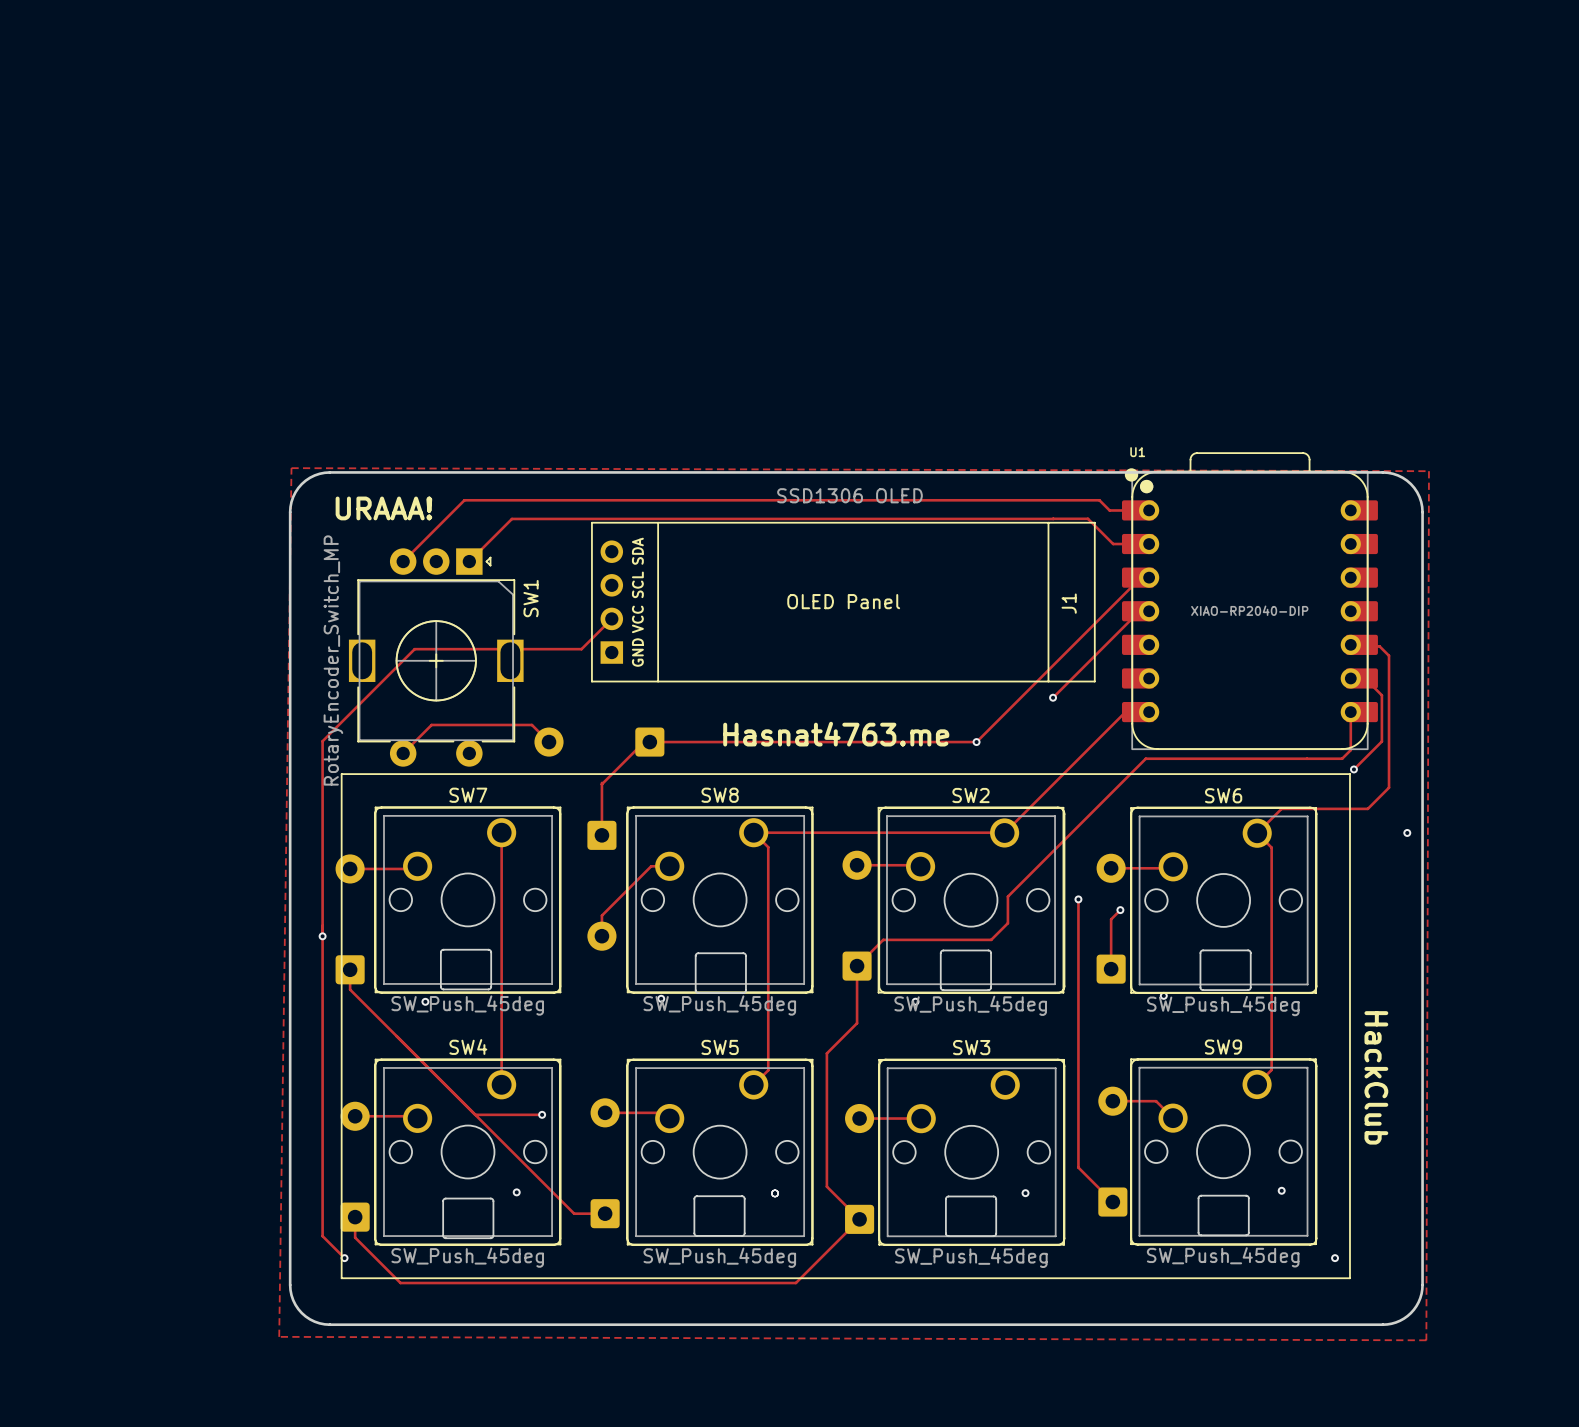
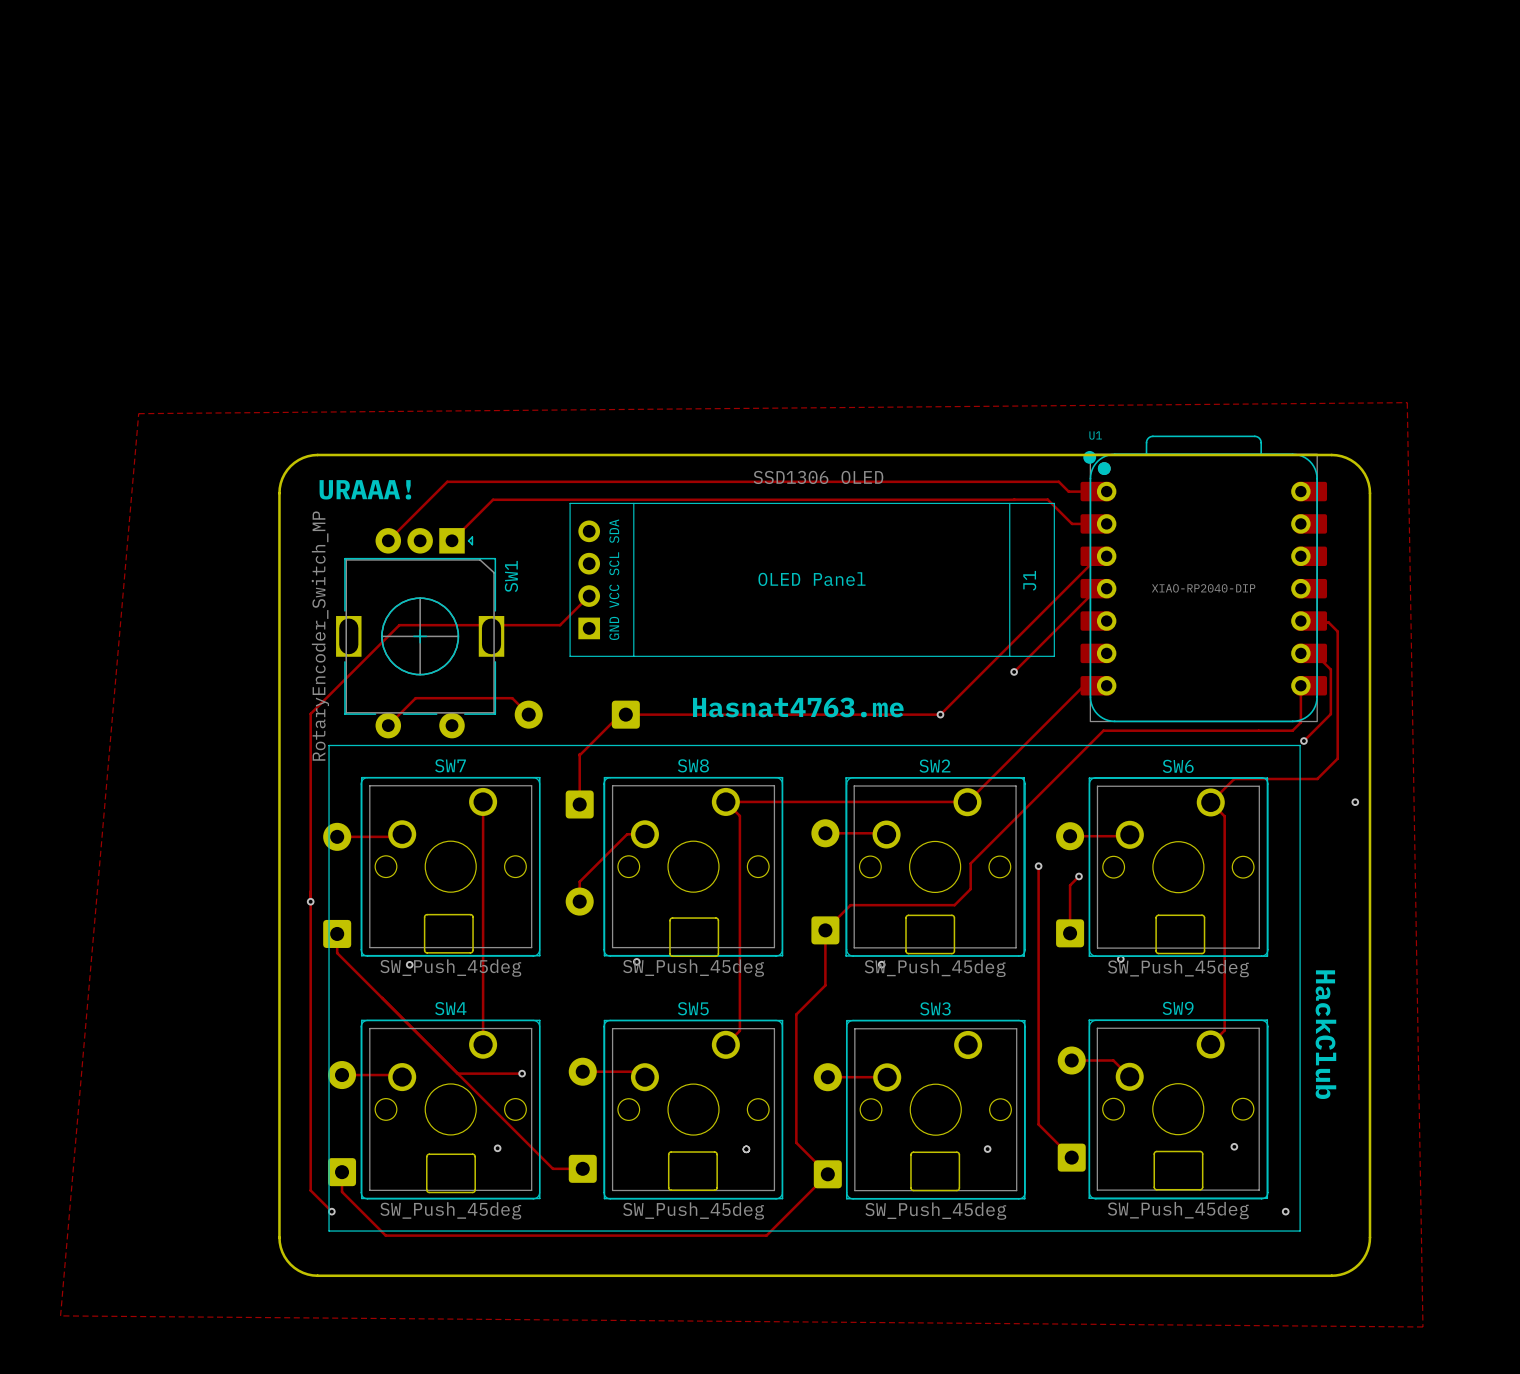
zone outline: (291, 468) (1428, 471) (1426, 1340) (279, 1336) (291, 468) -> (1407, 402) (138, 413) (60, 1315) (1422, 1326) (1407, 402)

